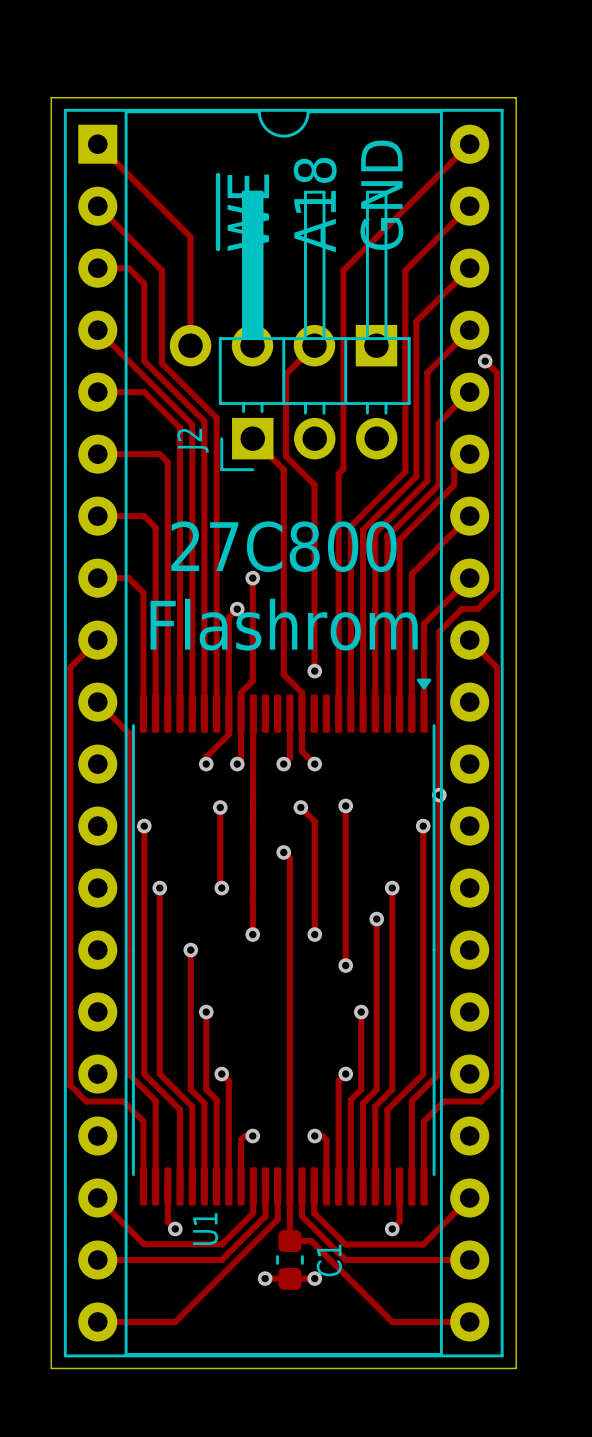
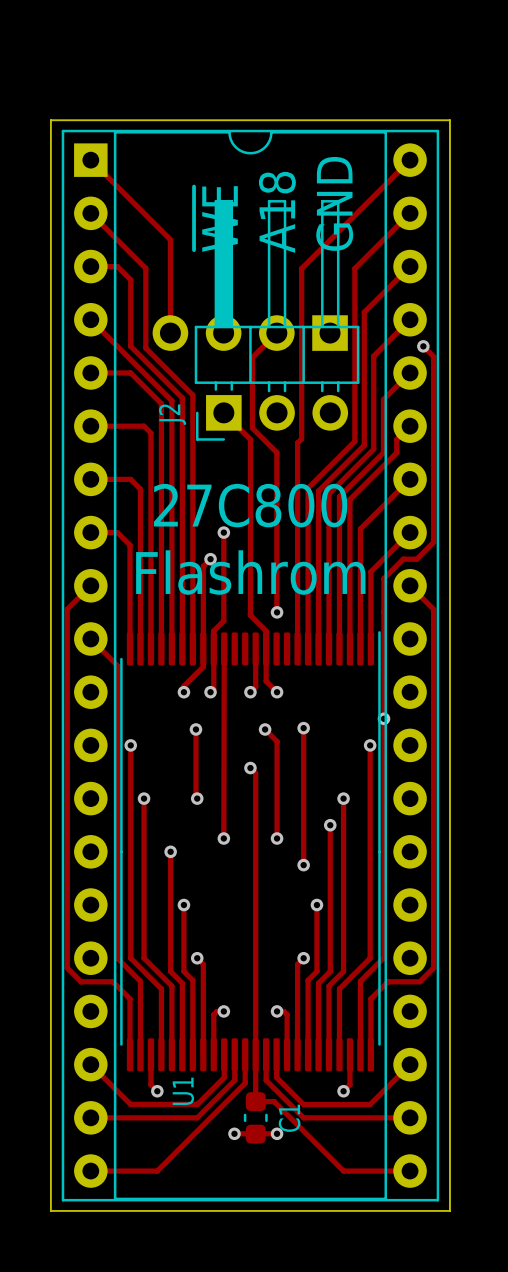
U1 footprint: [131, 678, 436, 1206] -> [120, 631, 381, 1072]

